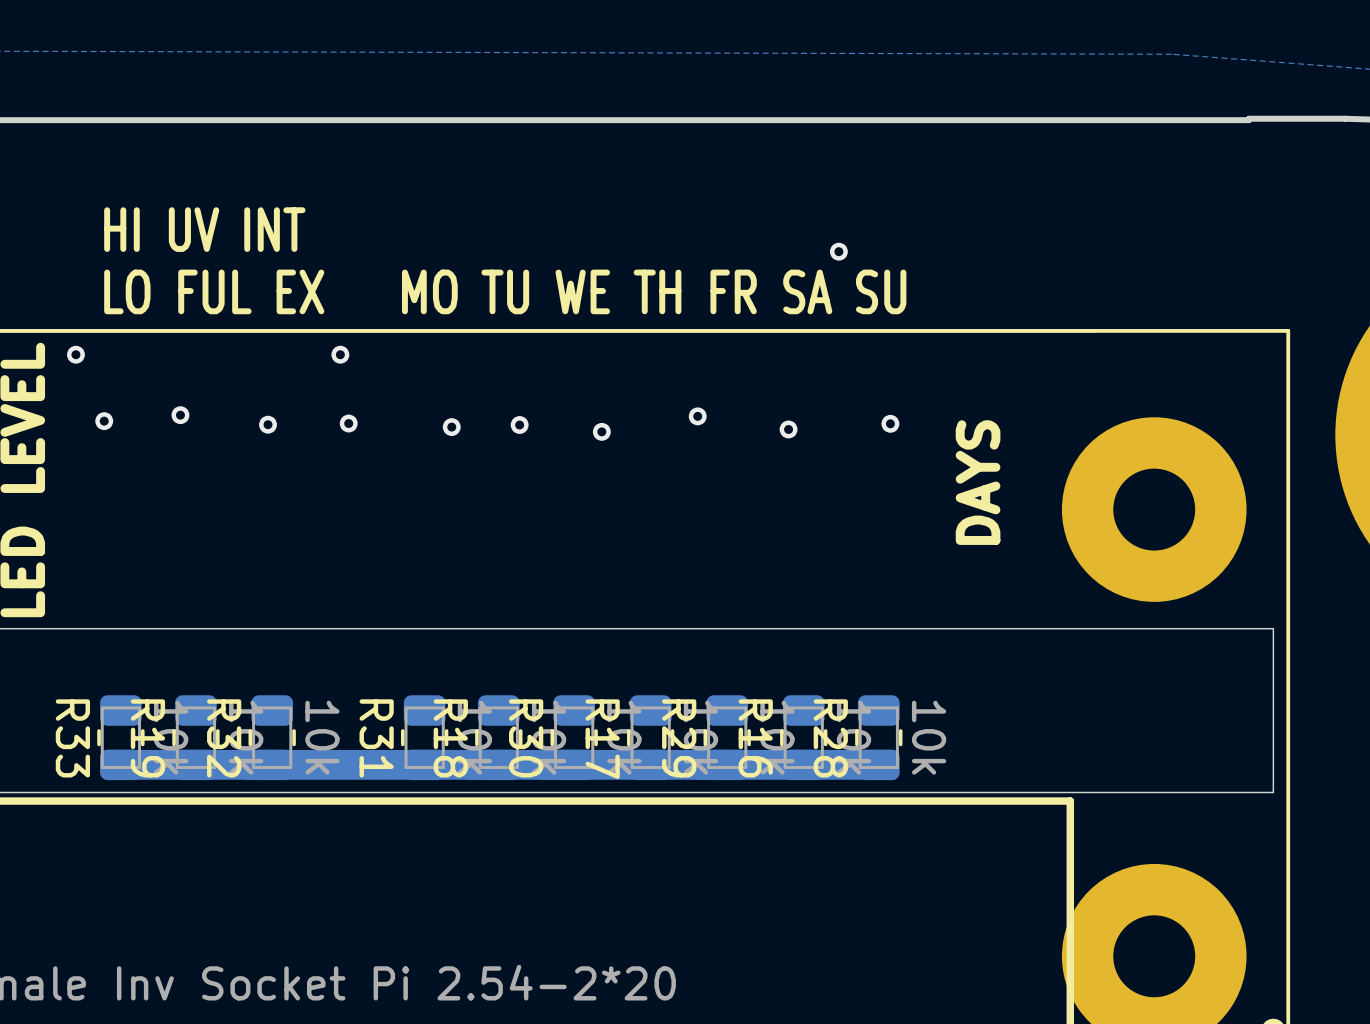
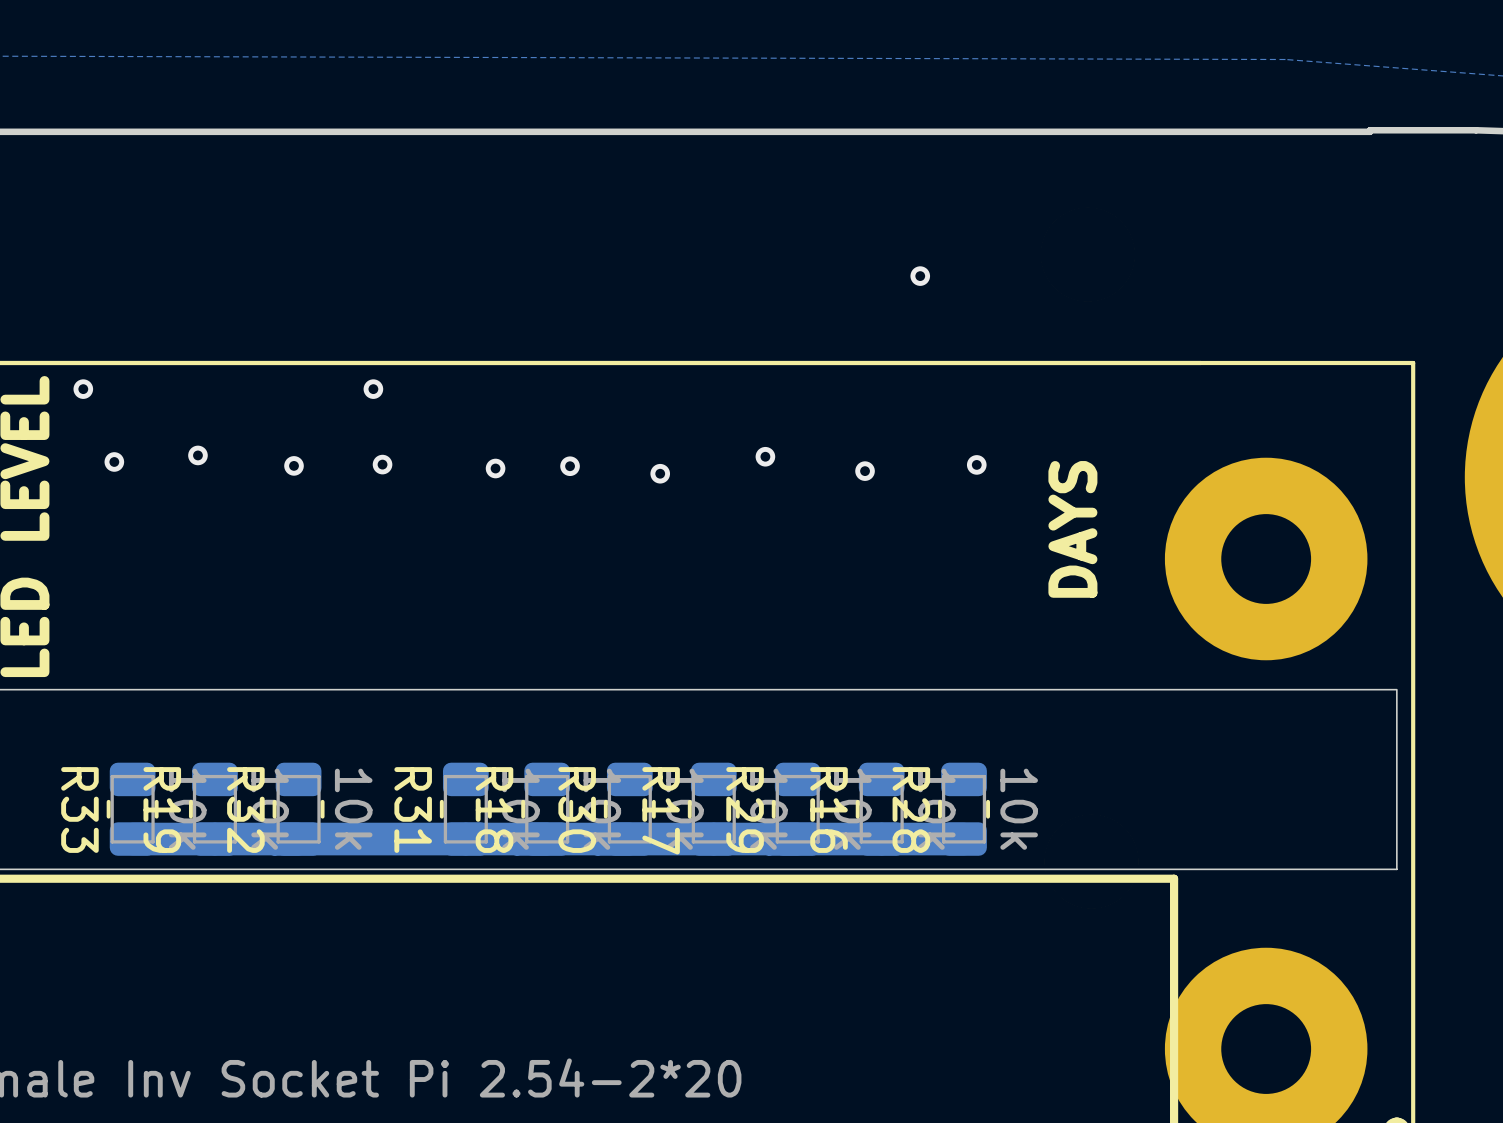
text: HI UV INT (204, 229) -> none
text: LO FUL EX (214, 291) -> none
text: MO TU WE TH FR SA SU (654, 291) -> none

